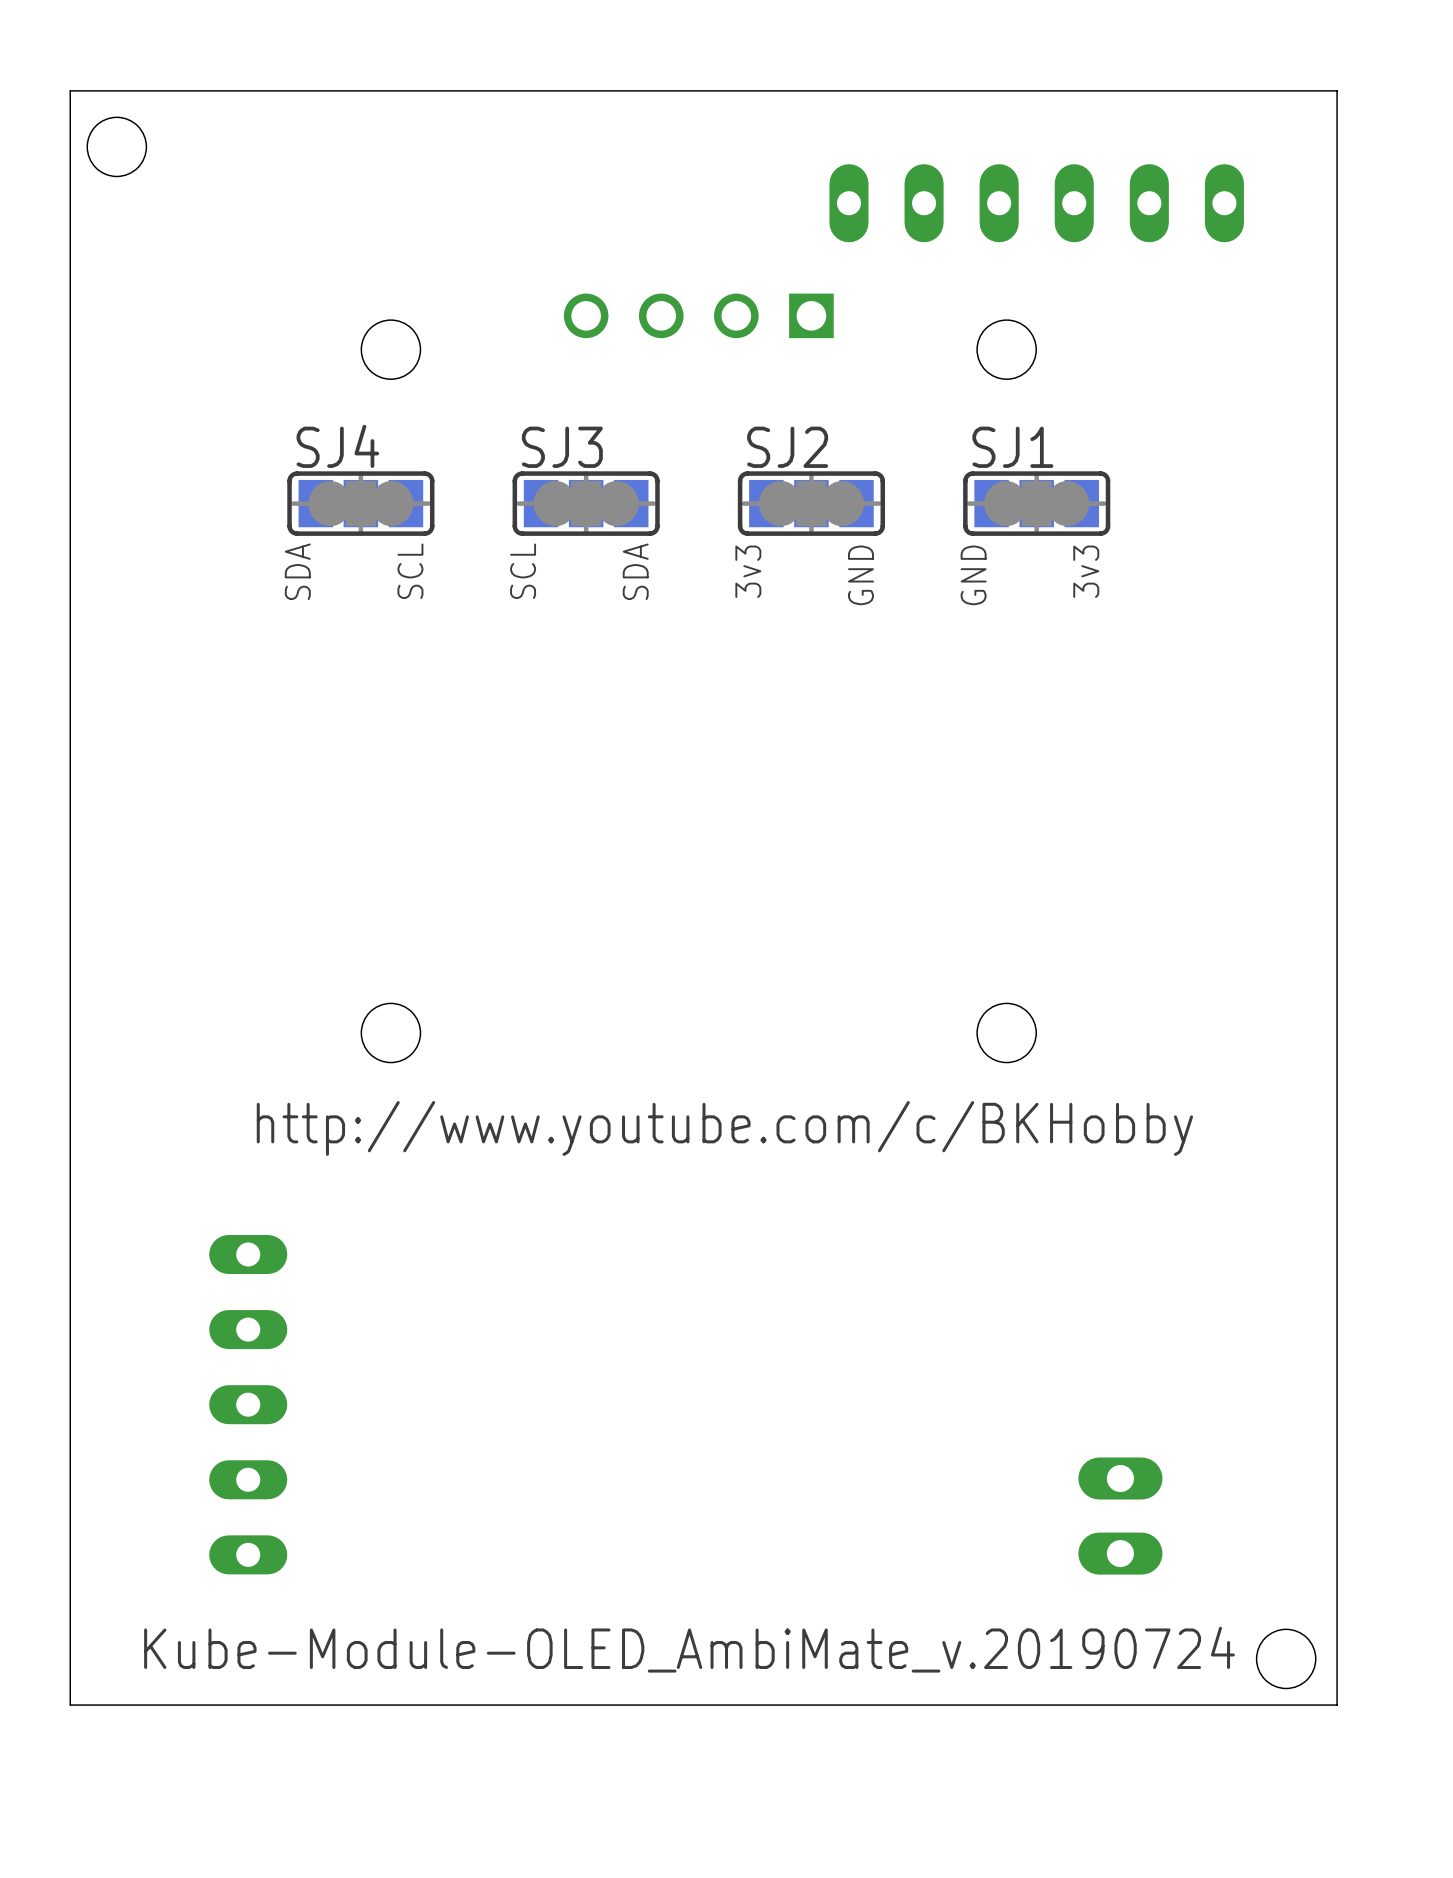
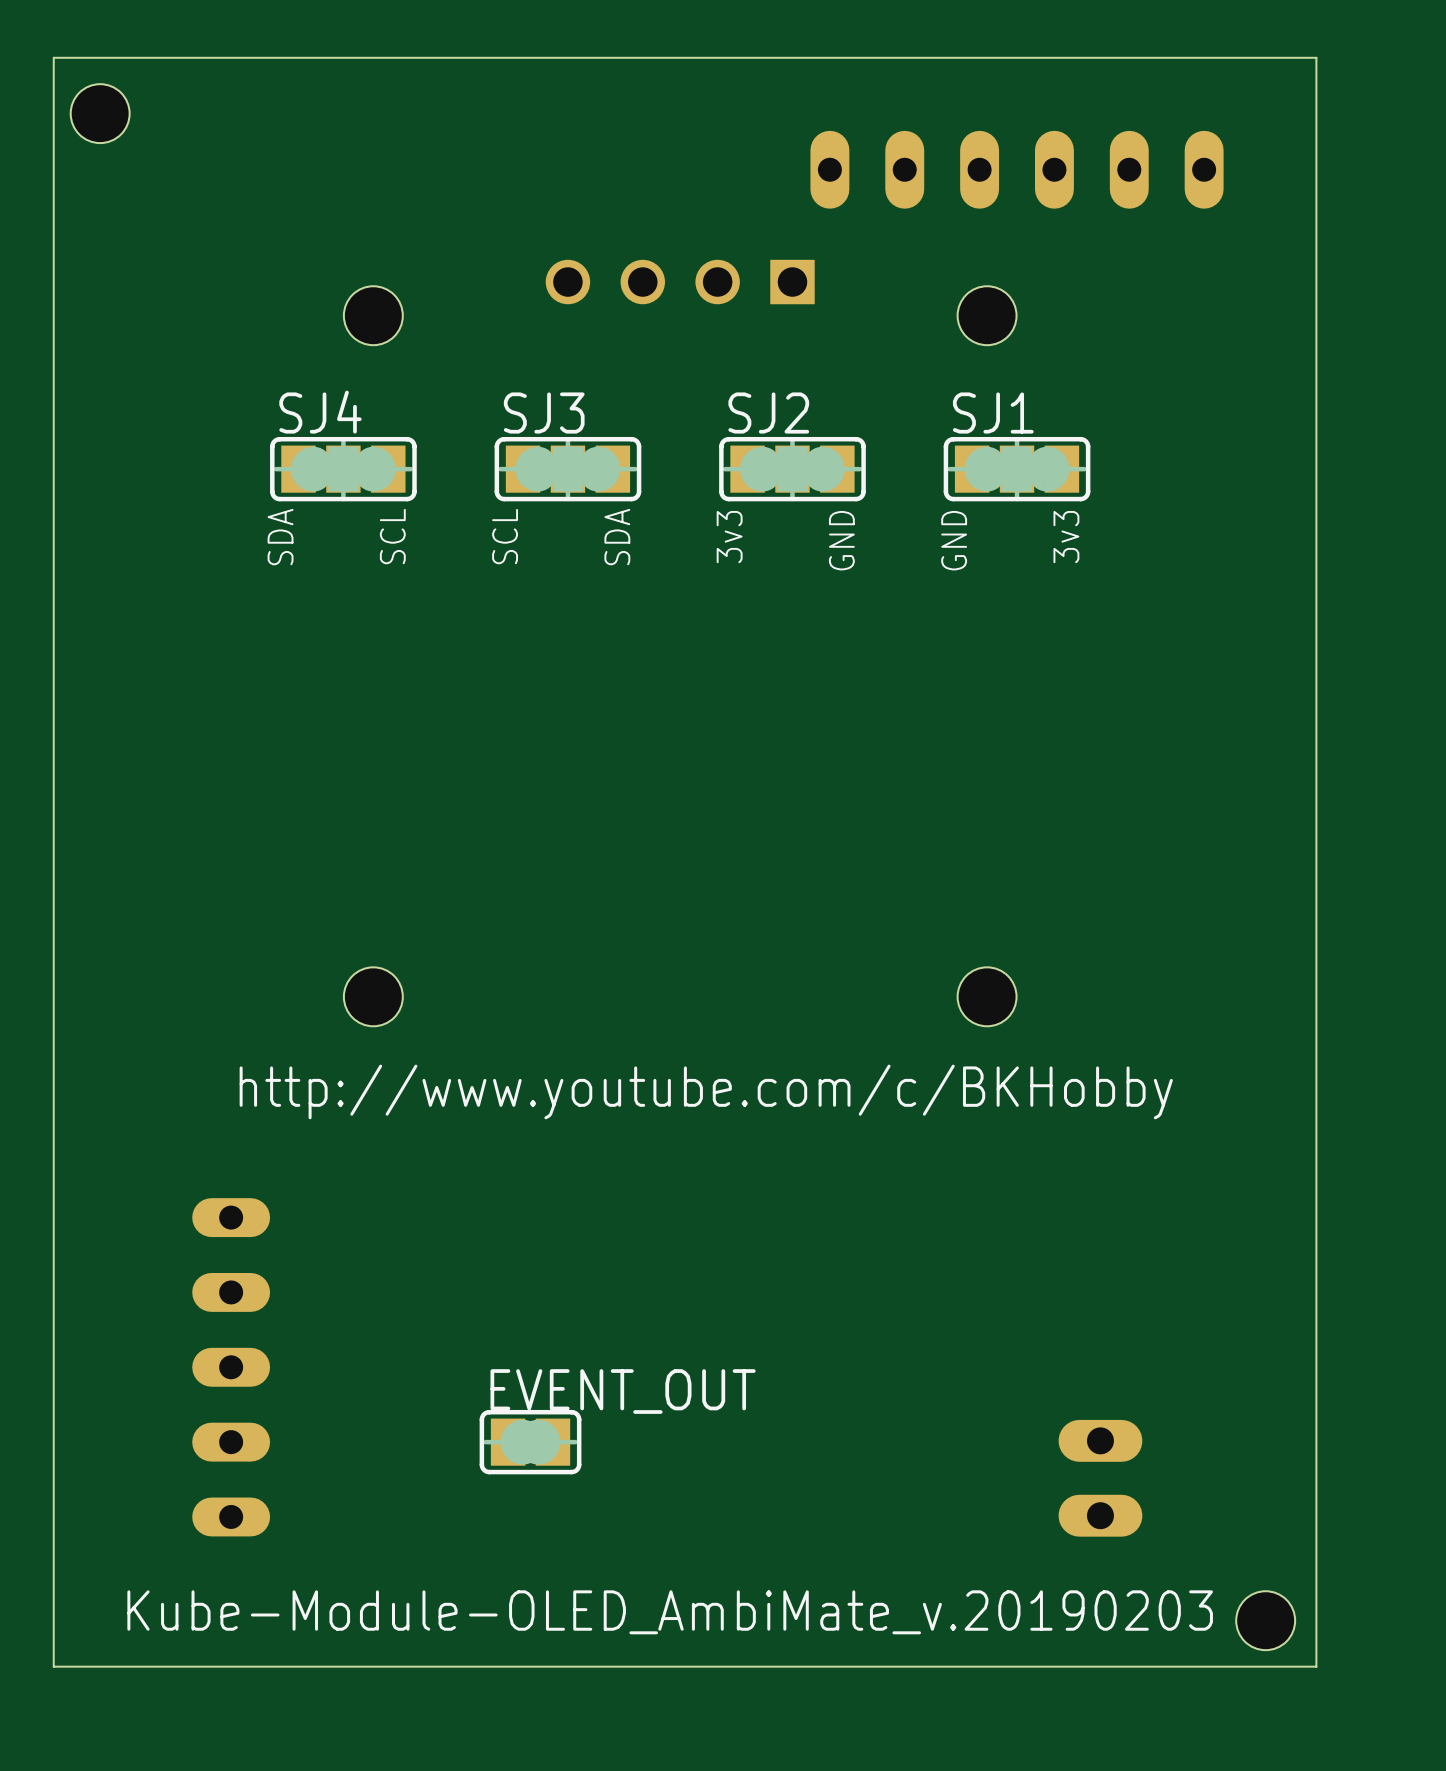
EVENT_OUT: none -> (530, 1442)
text: Kube-Module-OLED_AmbiMate_v.20190724 (689, 1649) -> Kube-Module-OLED_AmbiMate_v.20190203 (670, 1612)

